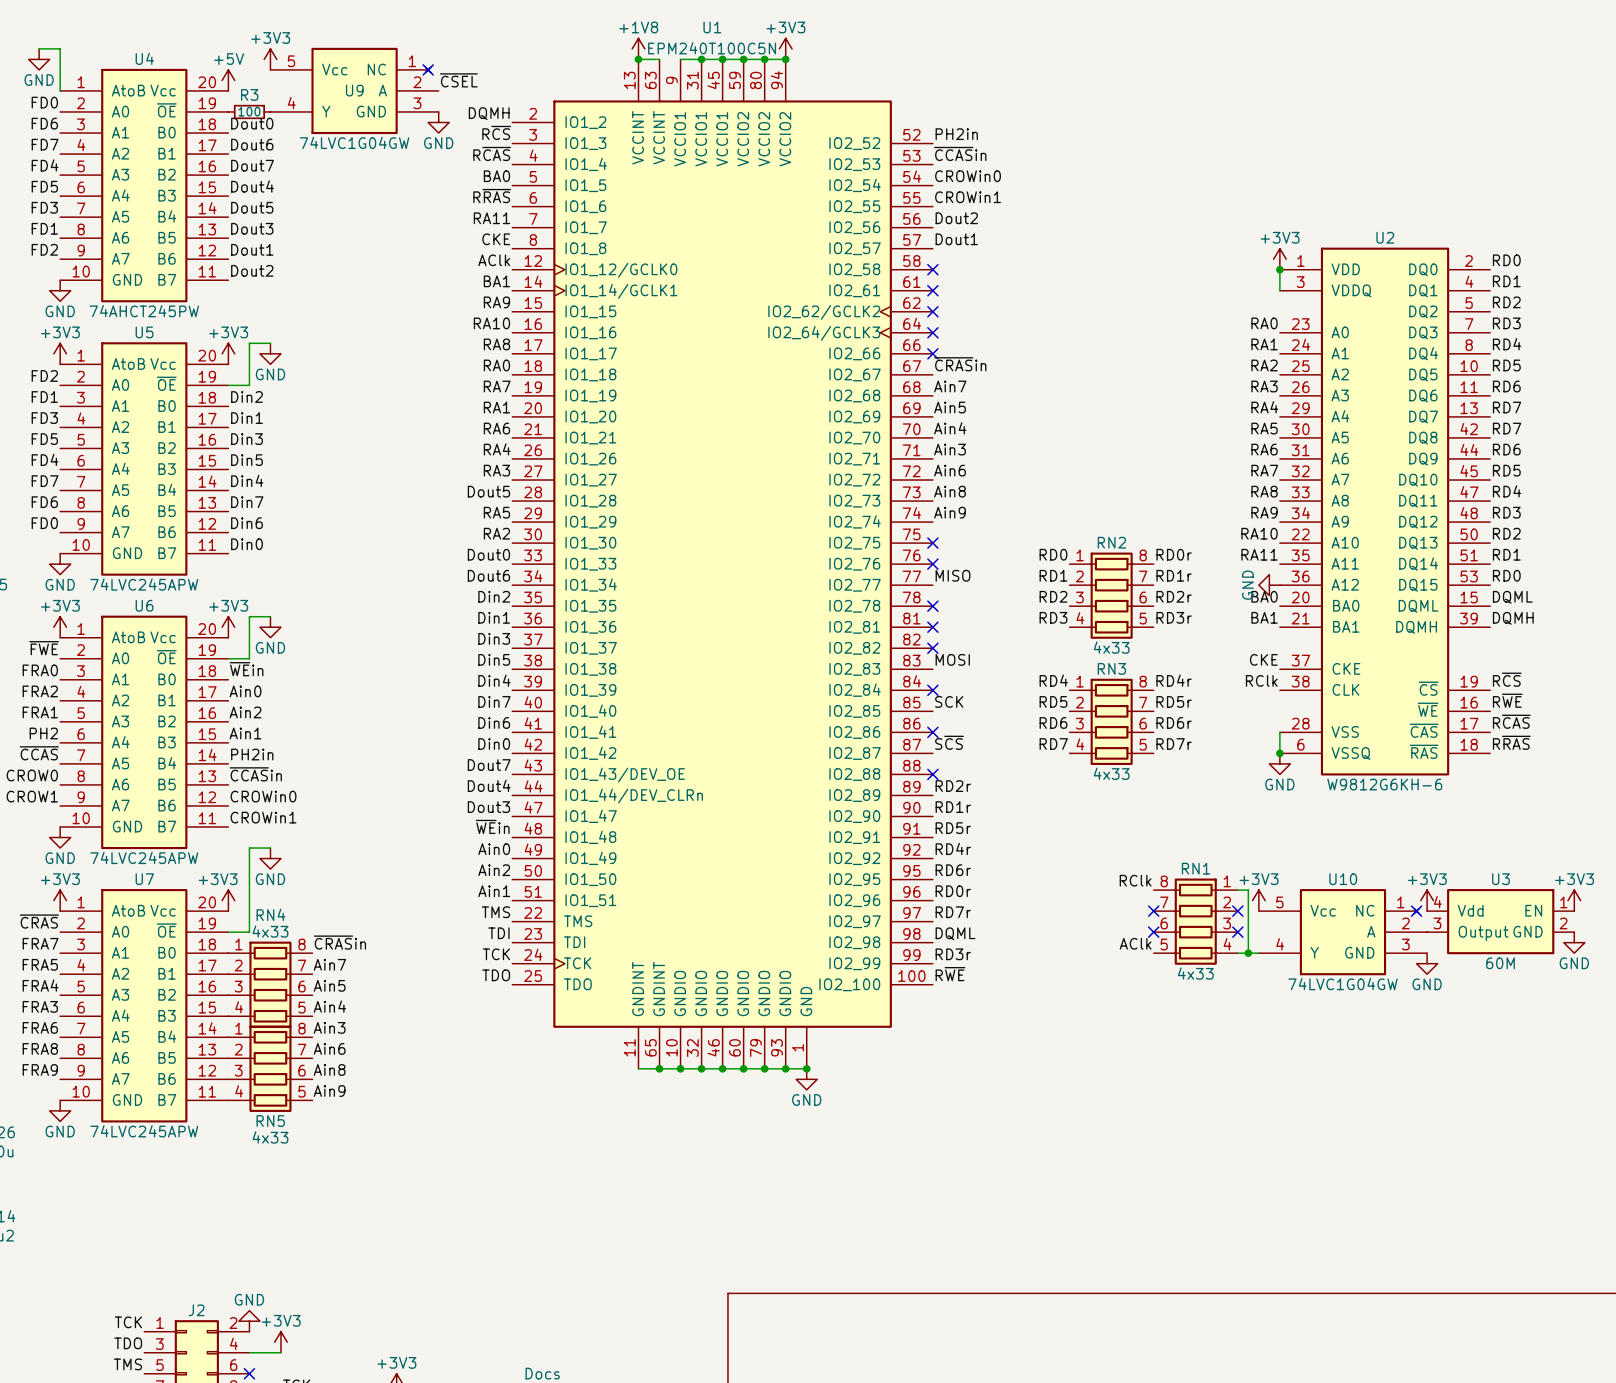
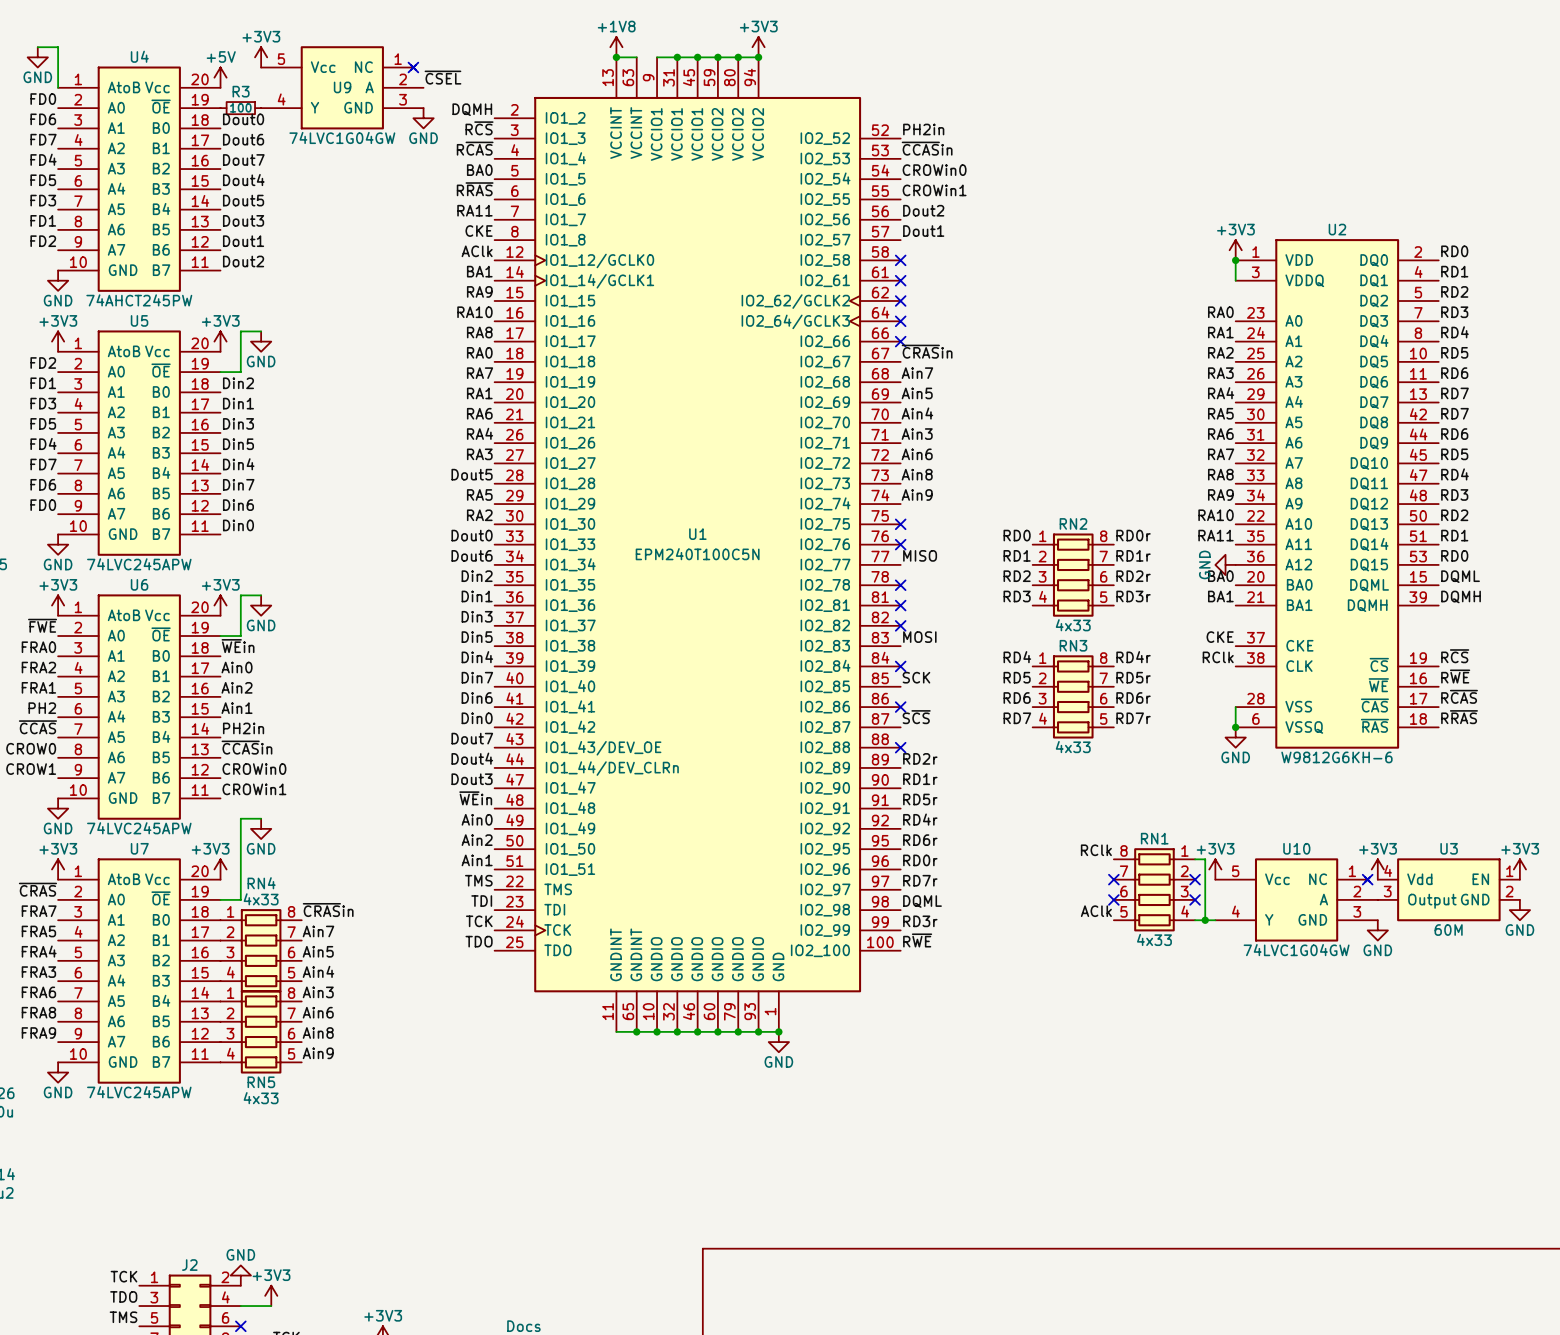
U1 name position: U1 (712, 27) -> U1 (697, 534)
U1 value position: EPM240T100C5N (712, 48) -> EPM240T100C5N (697, 554)

